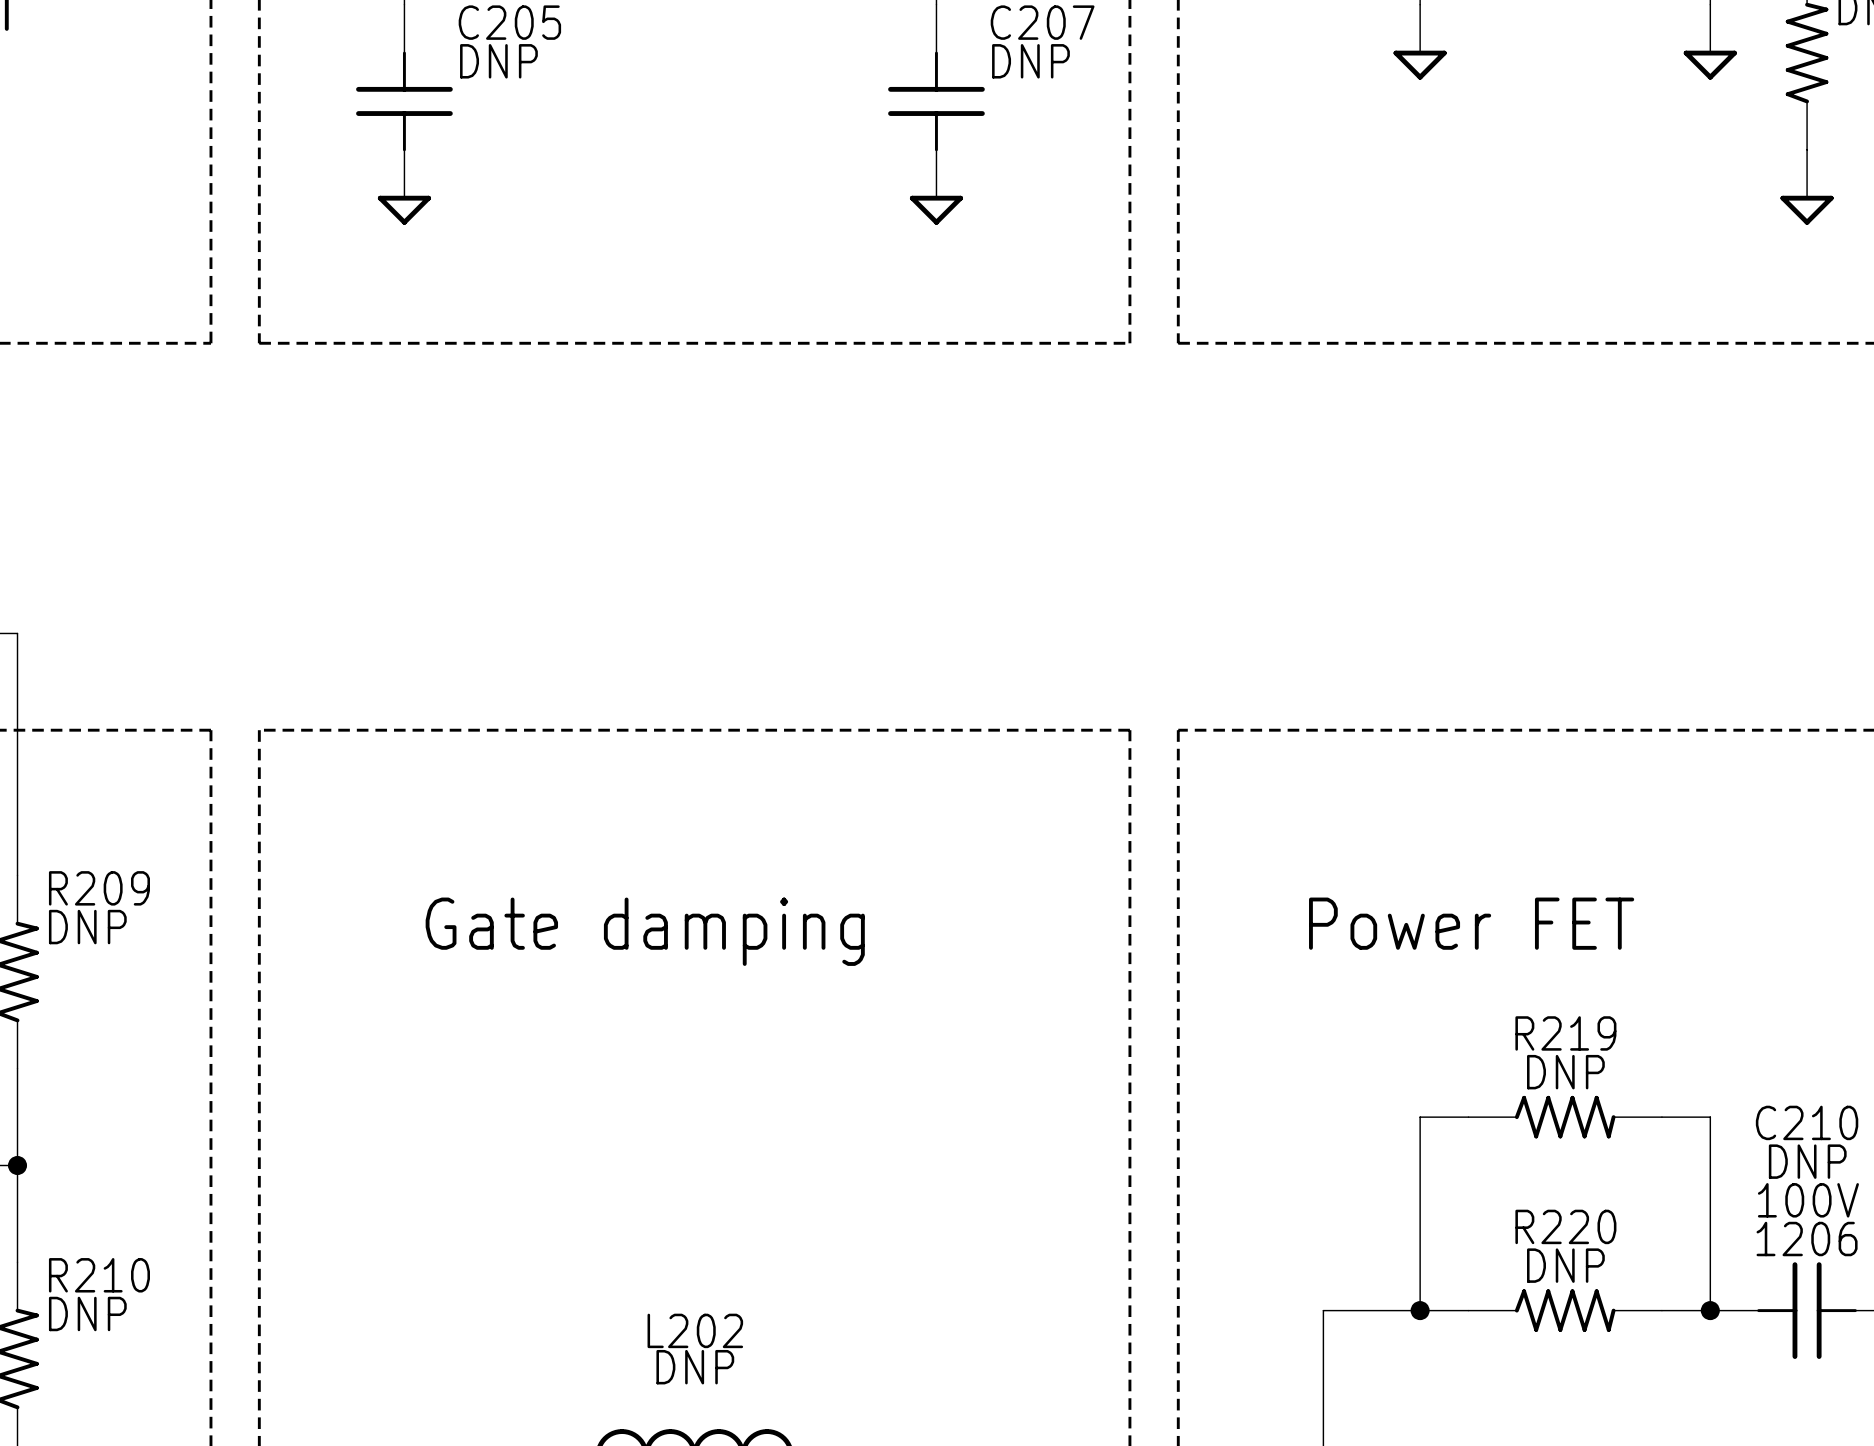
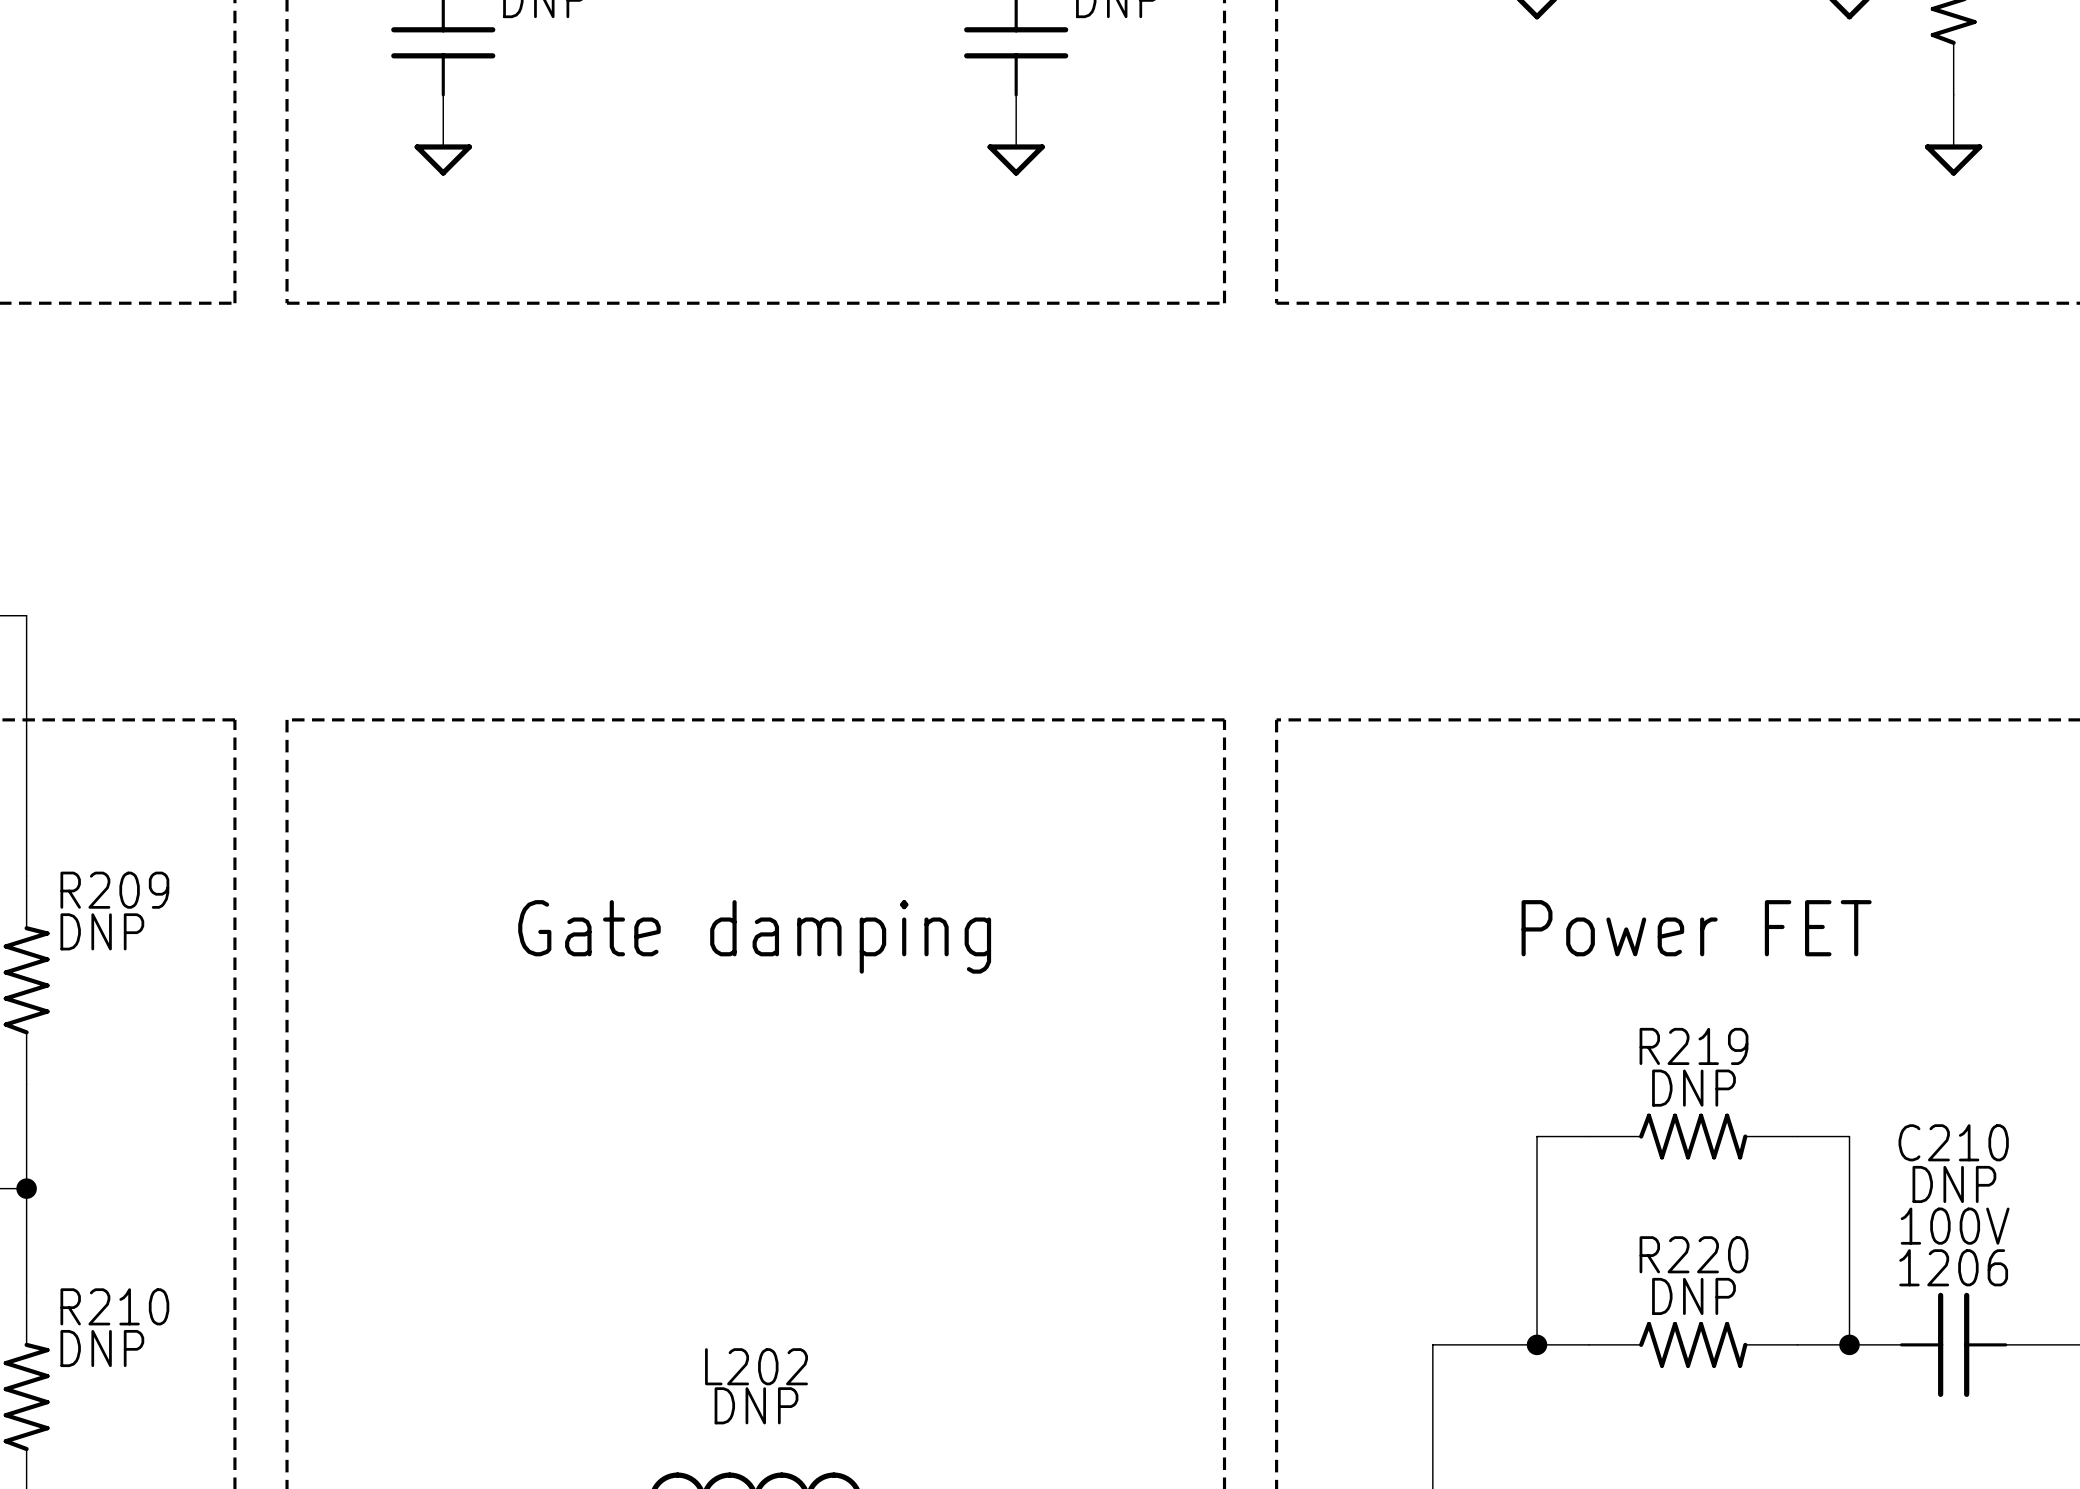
text position: Power FET (1471, 923) -> Power FET (1696, 928)
text position: Gate damping (645, 931) -> Gate damping (754, 936)

